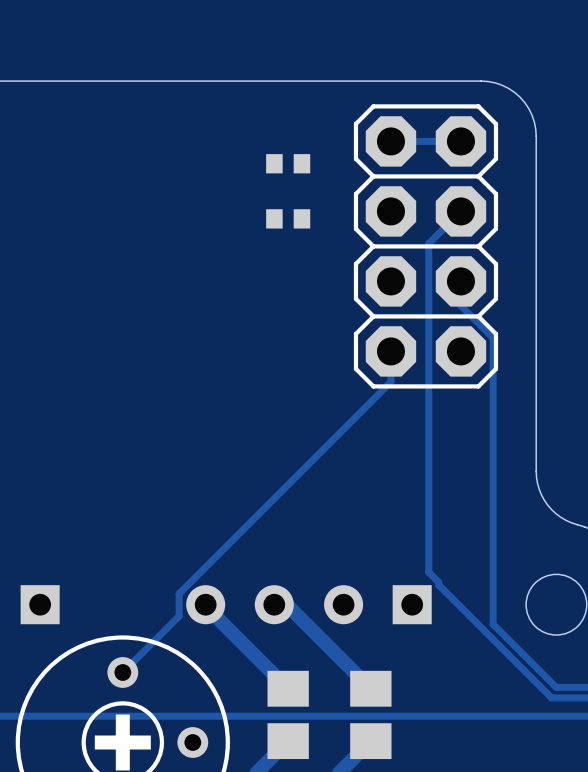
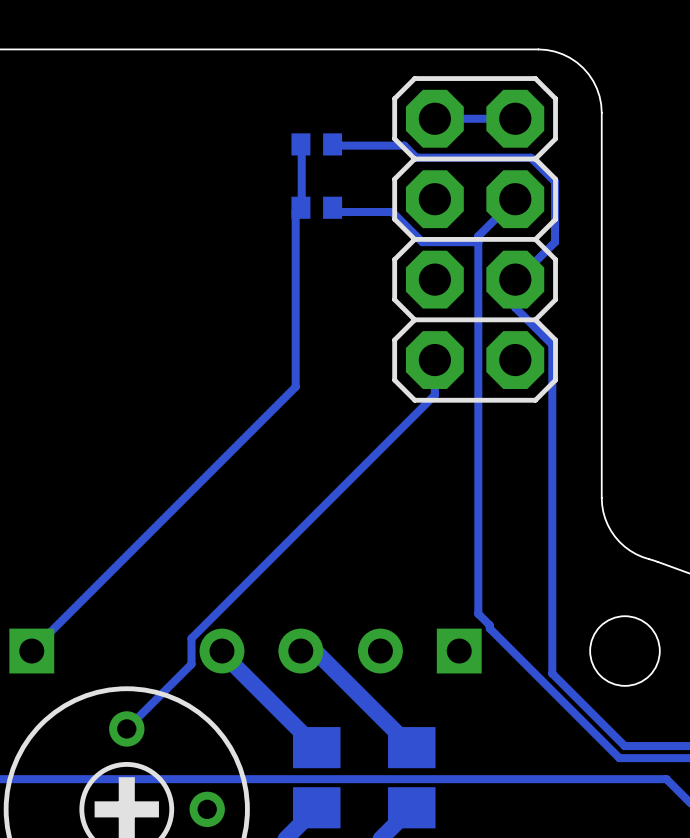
track: none -> (300, 144) (301, 205) (295, 211) (295, 386) (31, 651)
track: none -> (332, 144) (404, 145) (416, 157) (530, 157) (555, 181) (555, 242) (518, 278) (515, 279)
track: none -> (332, 207) (337, 211) (392, 211) (422, 242) (478, 242)

